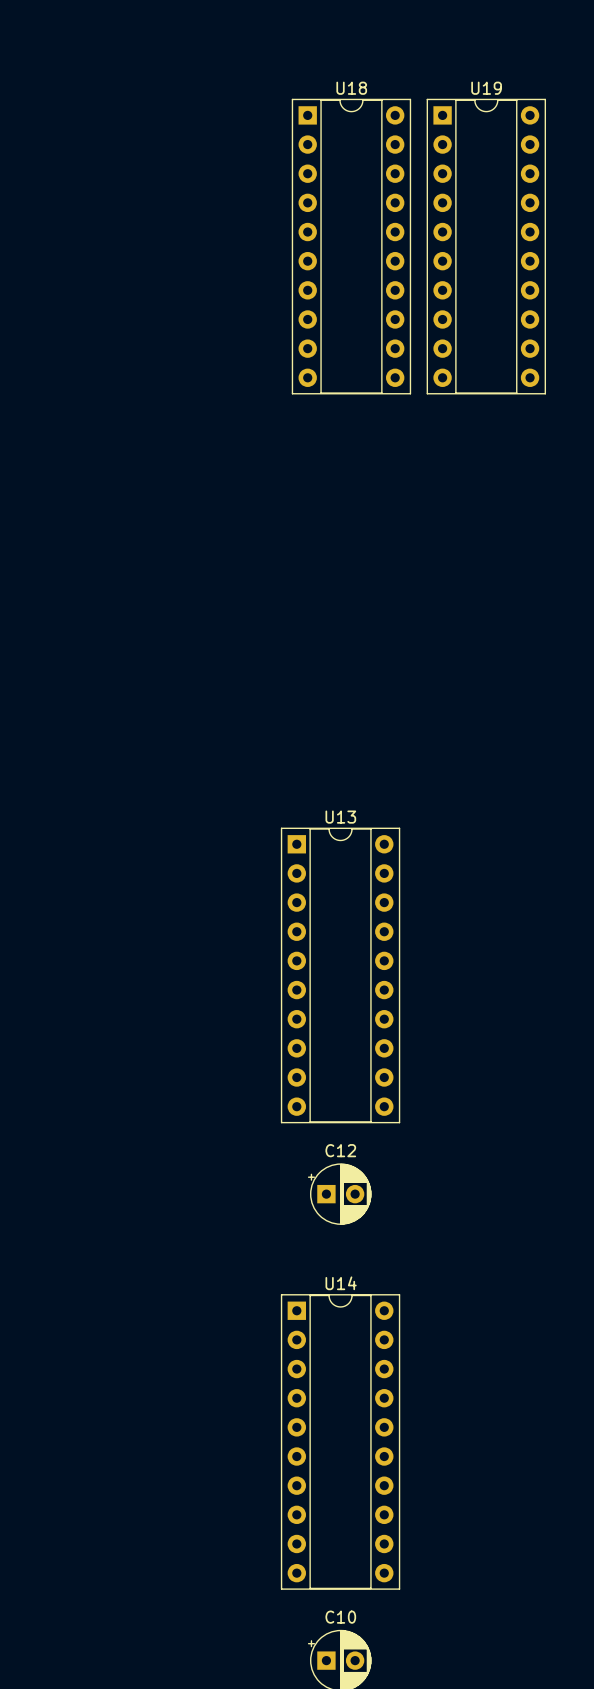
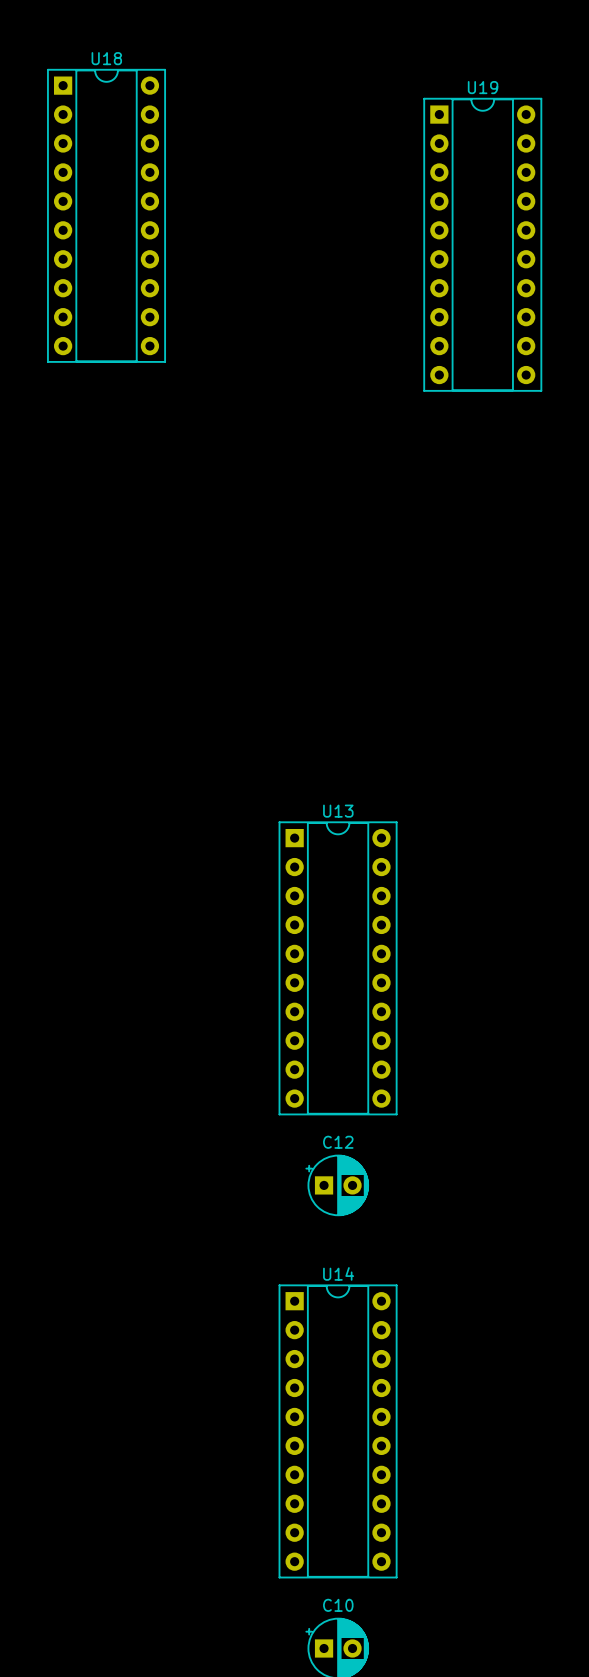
U18 position: (351, 246) -> (106, 215)

